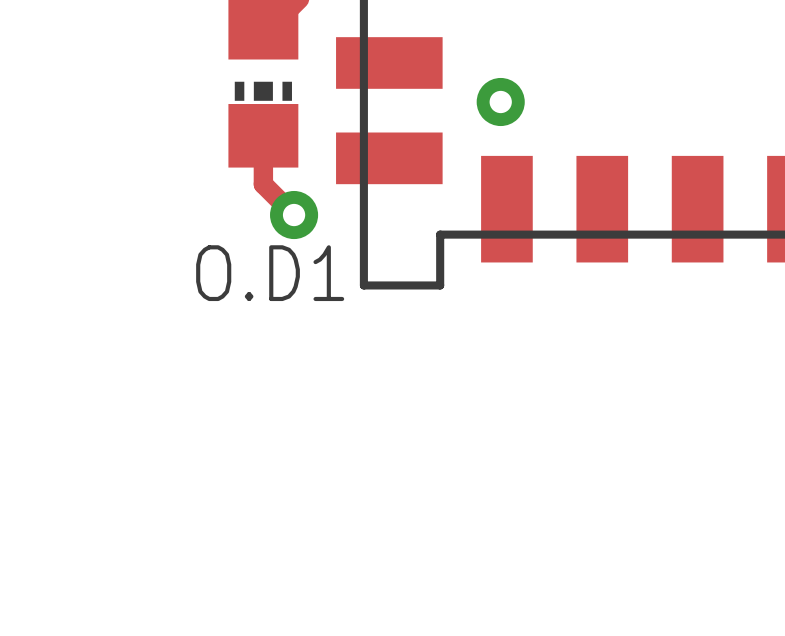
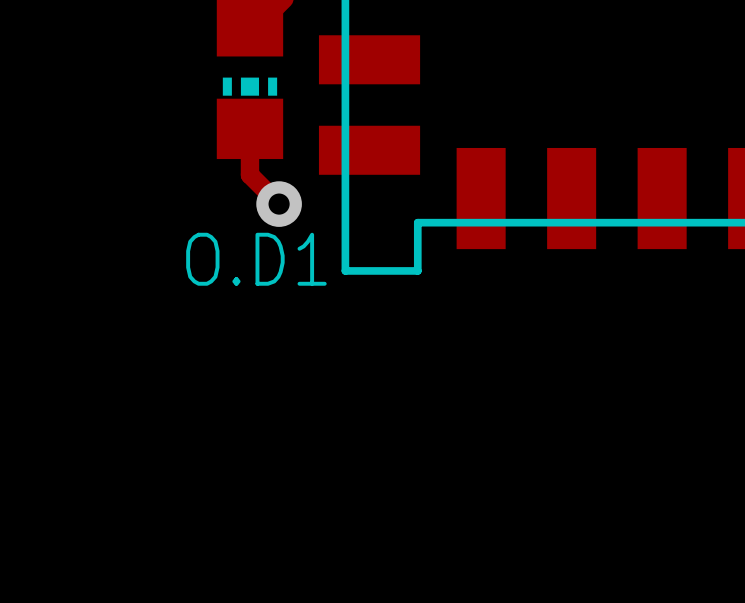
via: (500, 102) -> none

